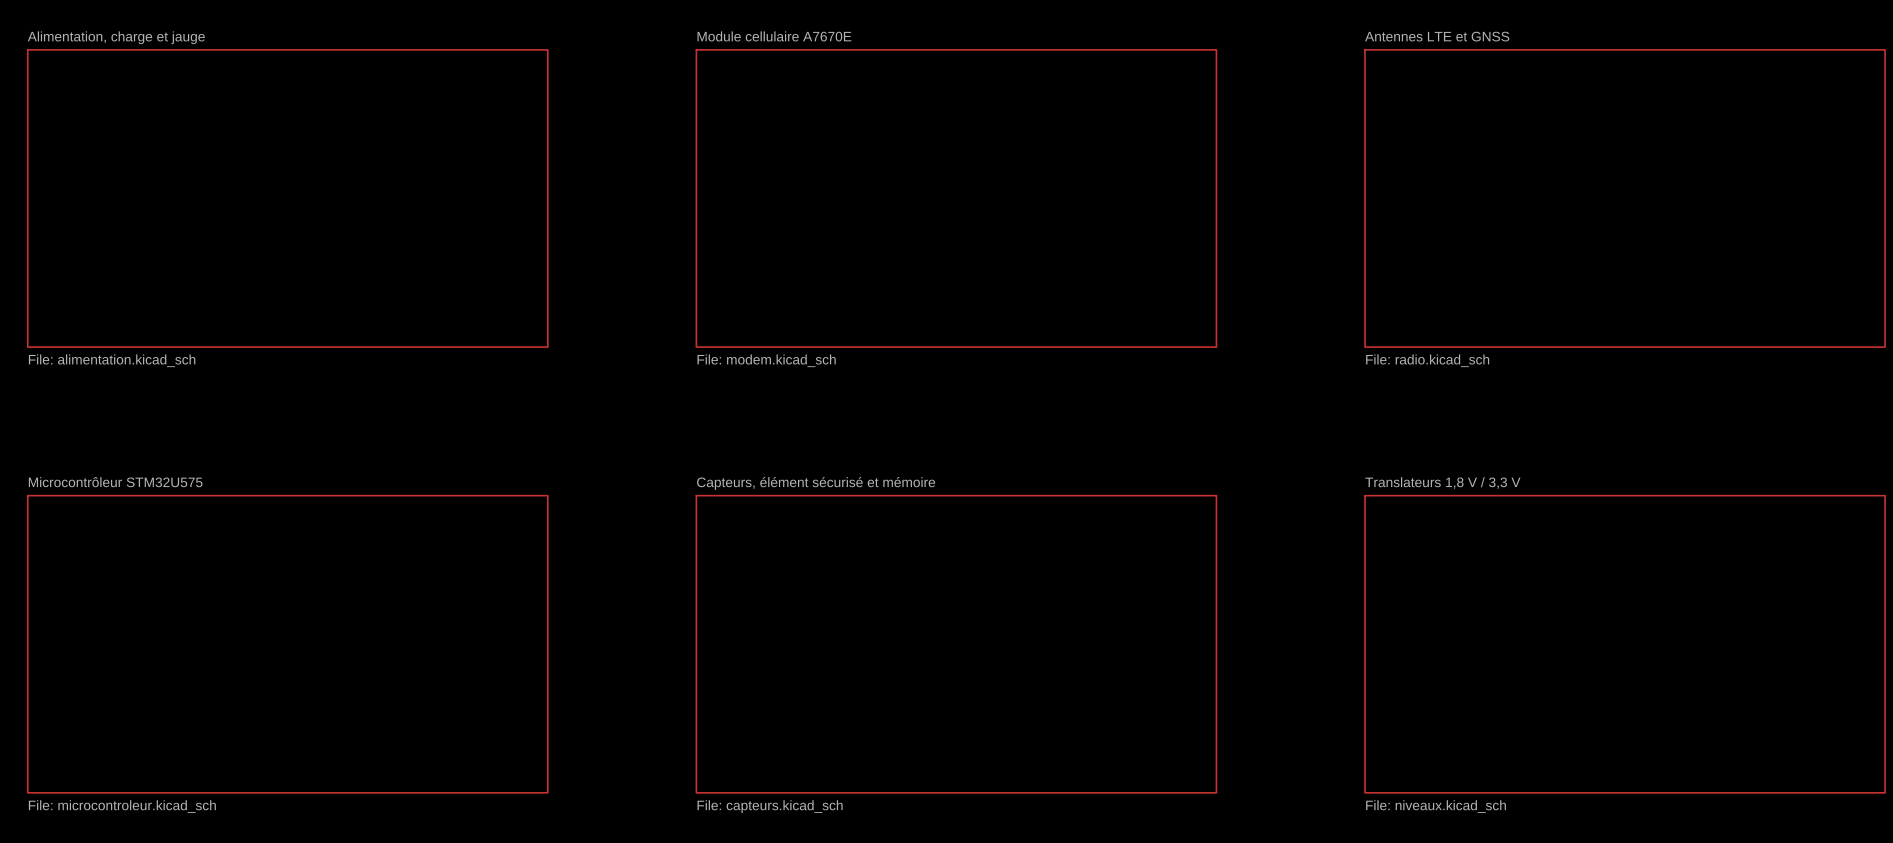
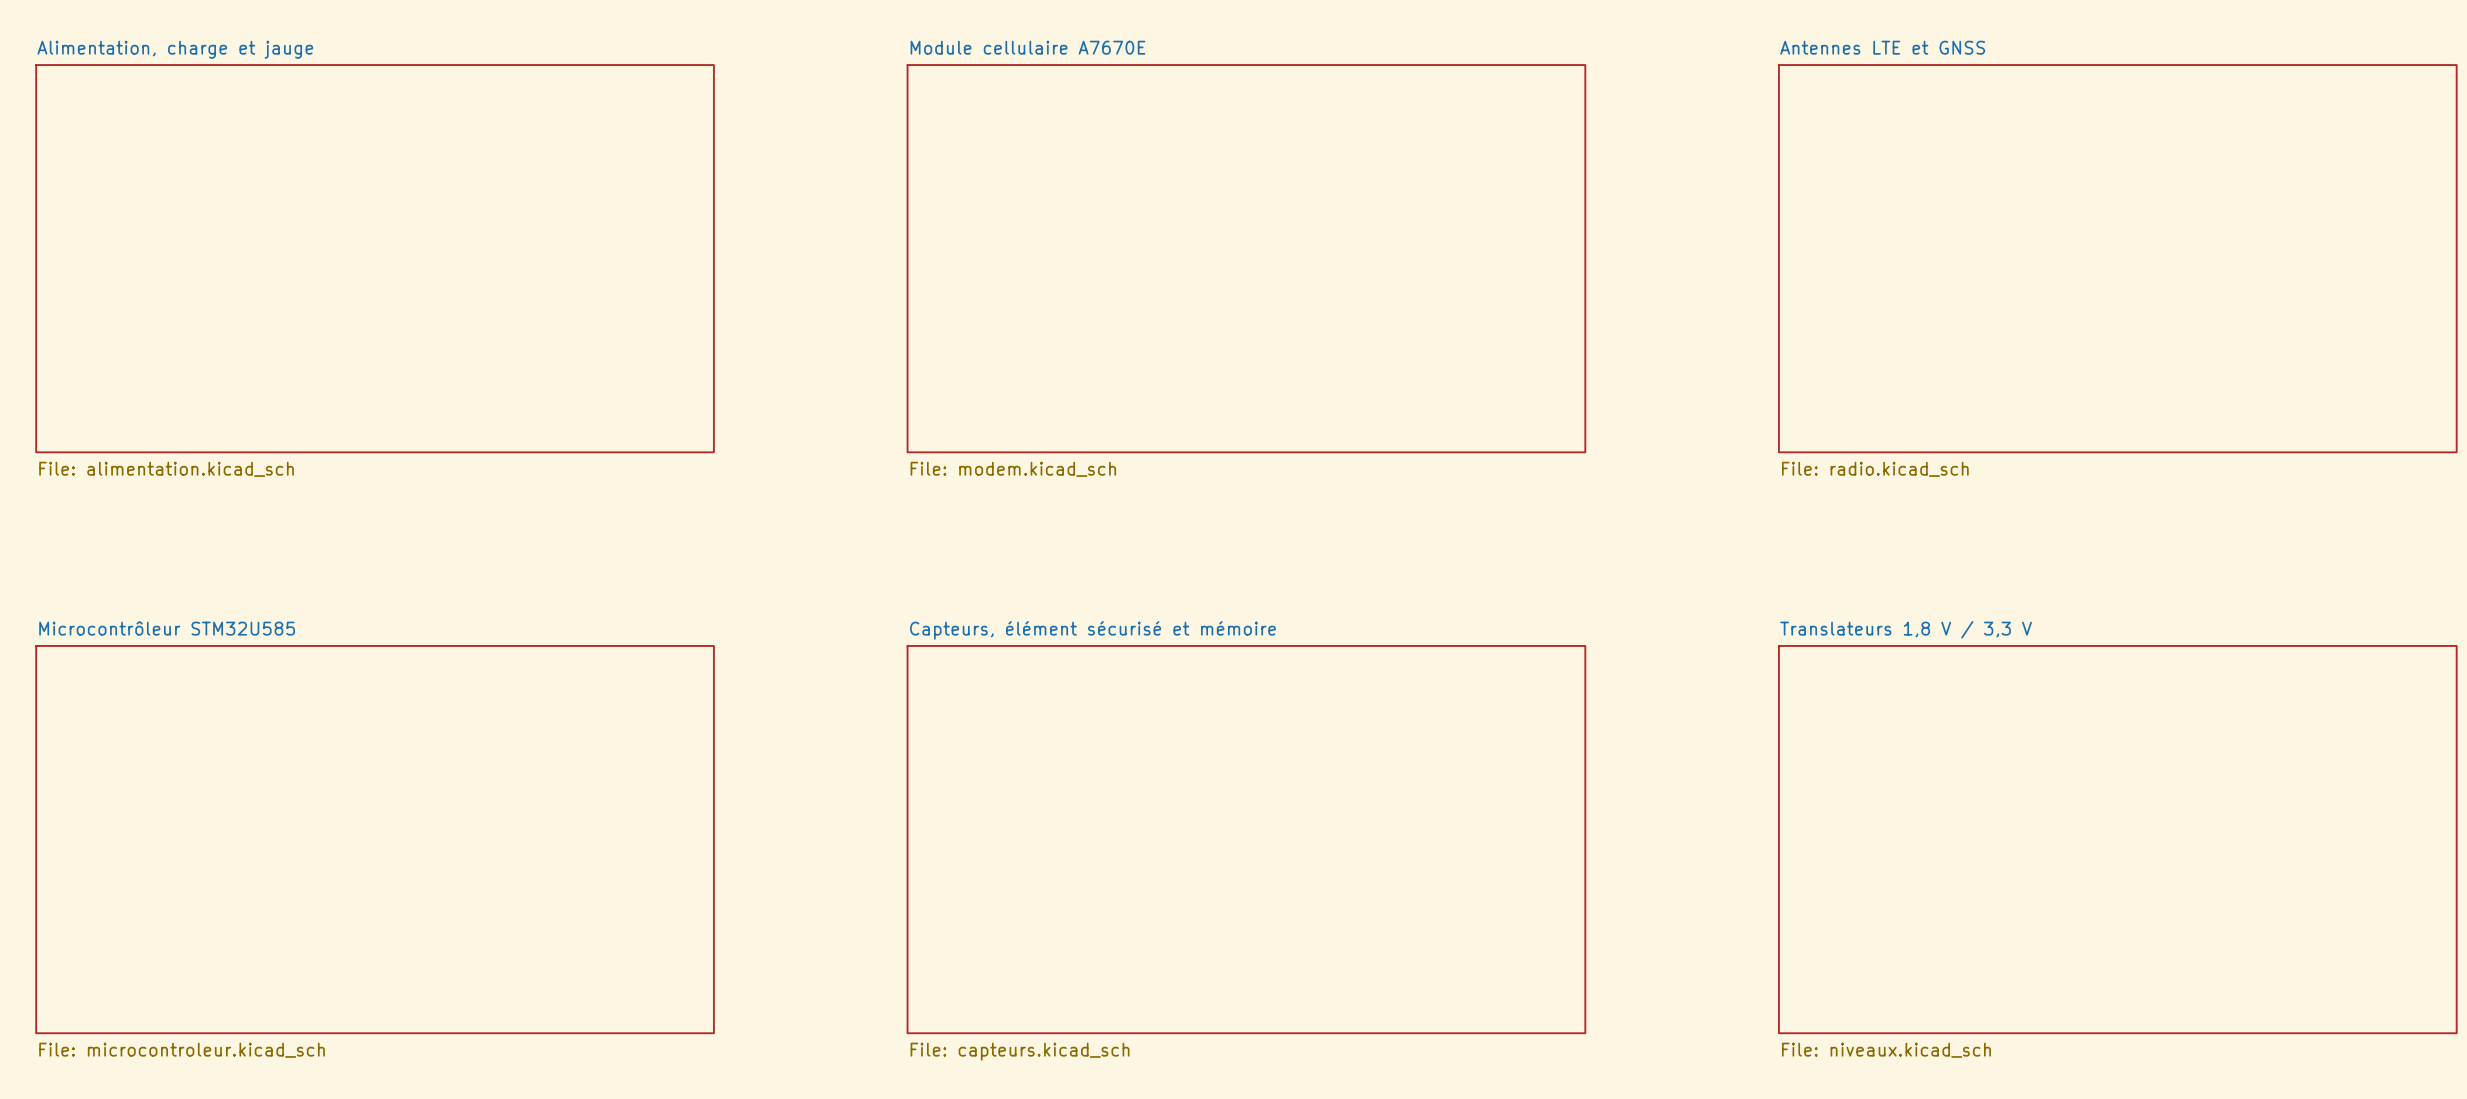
sheet Microcontrôleur STM32U575 name: Microcontrôleur STM32U575 (115, 482) -> Microcontrôleur STM32U585 (167, 628)

